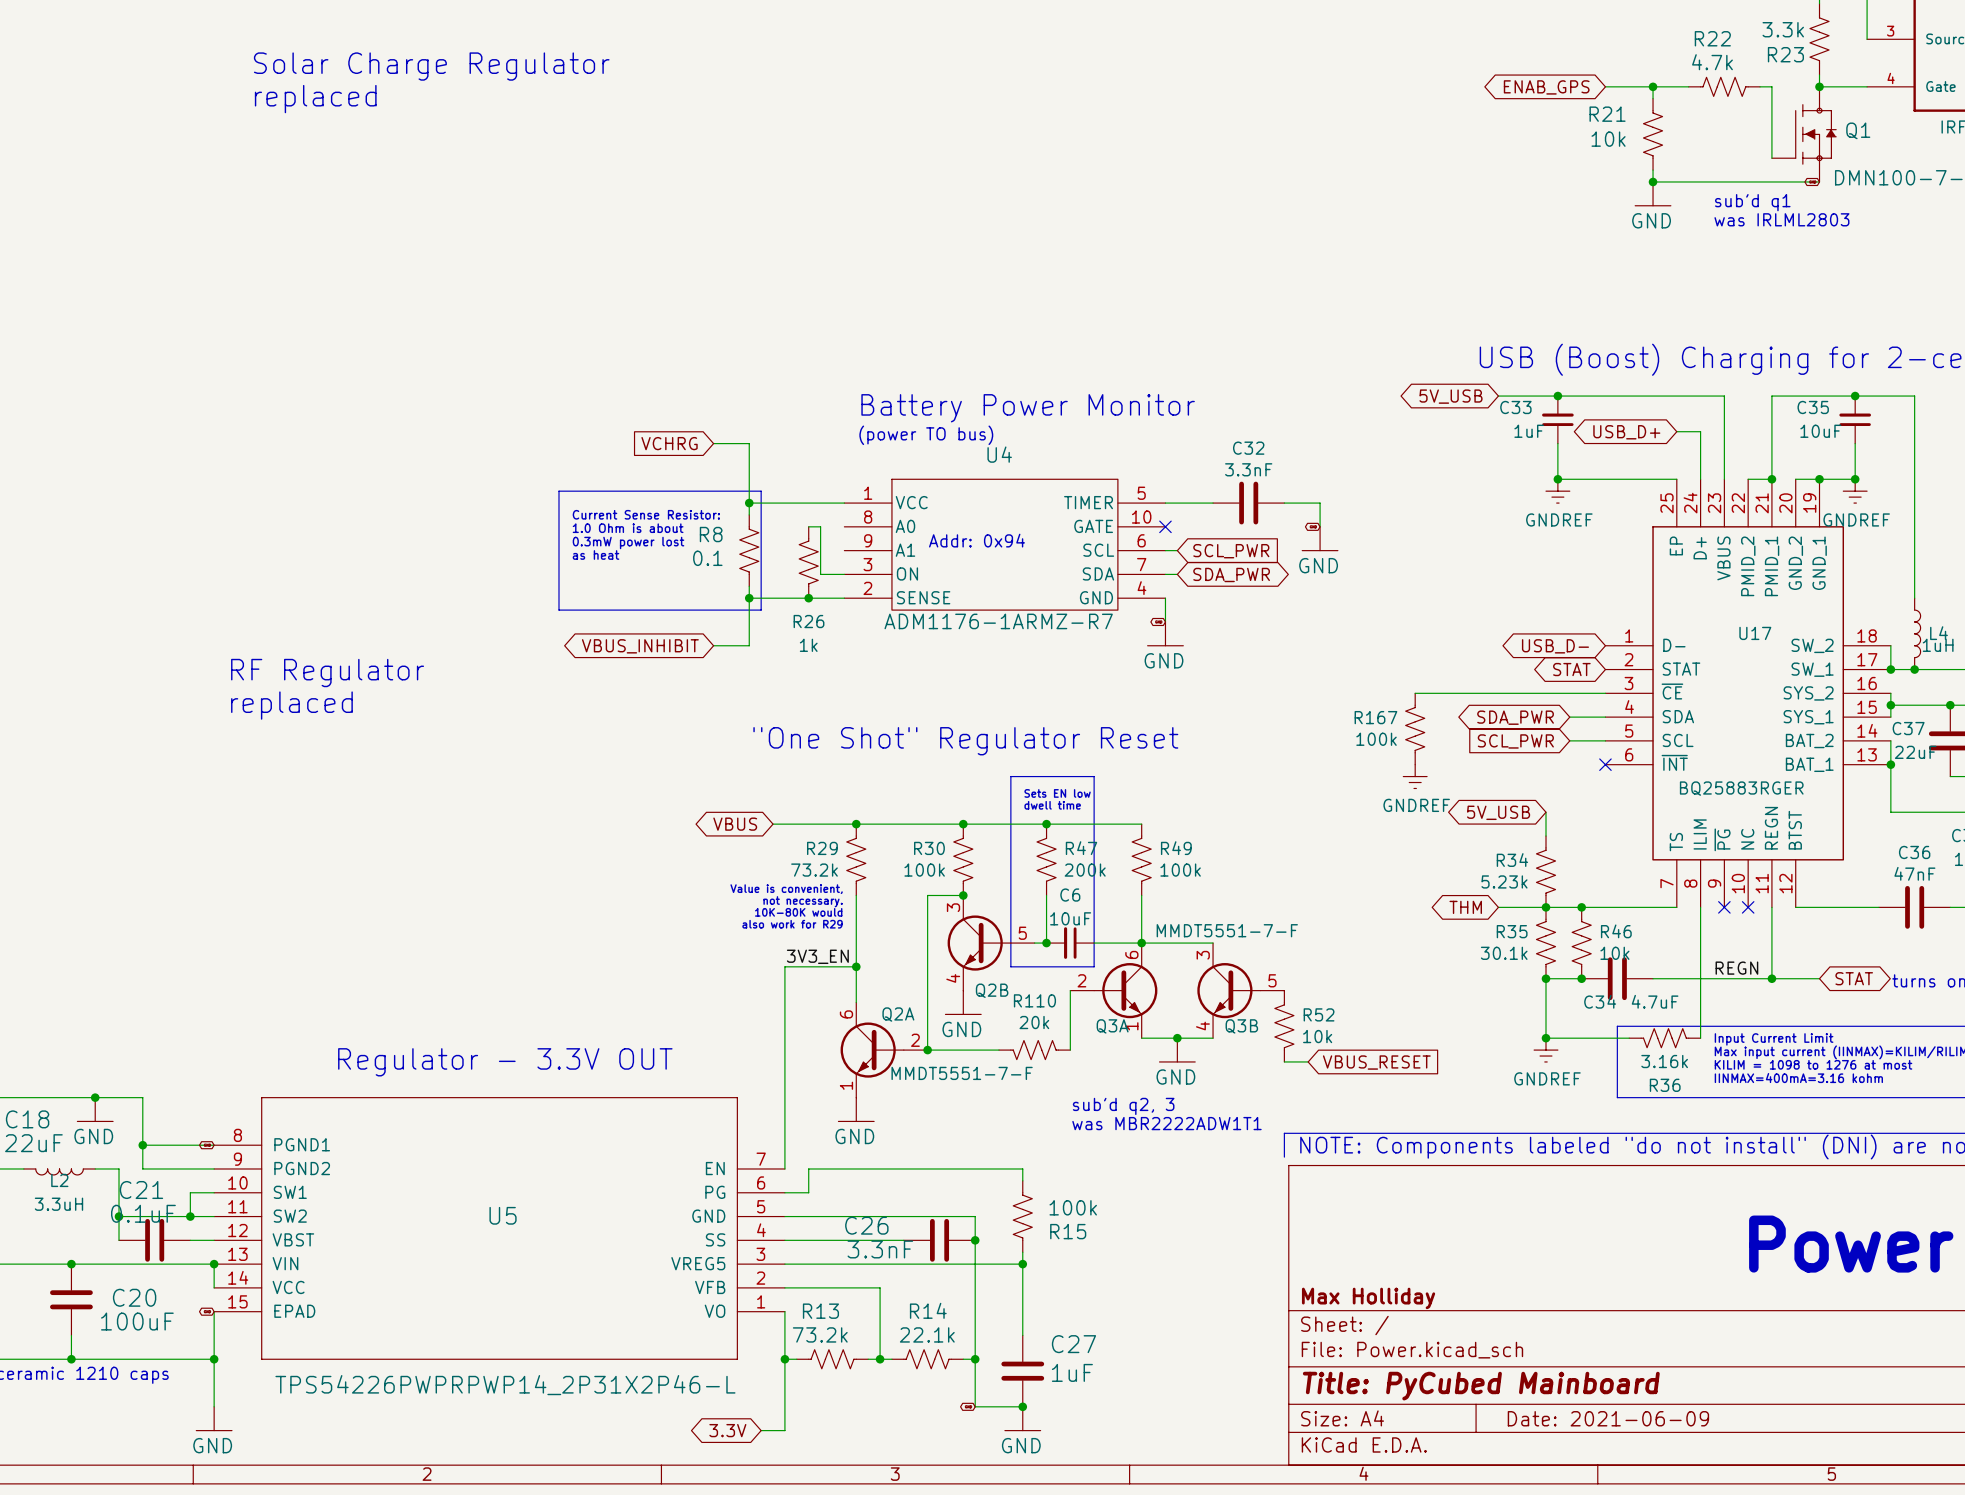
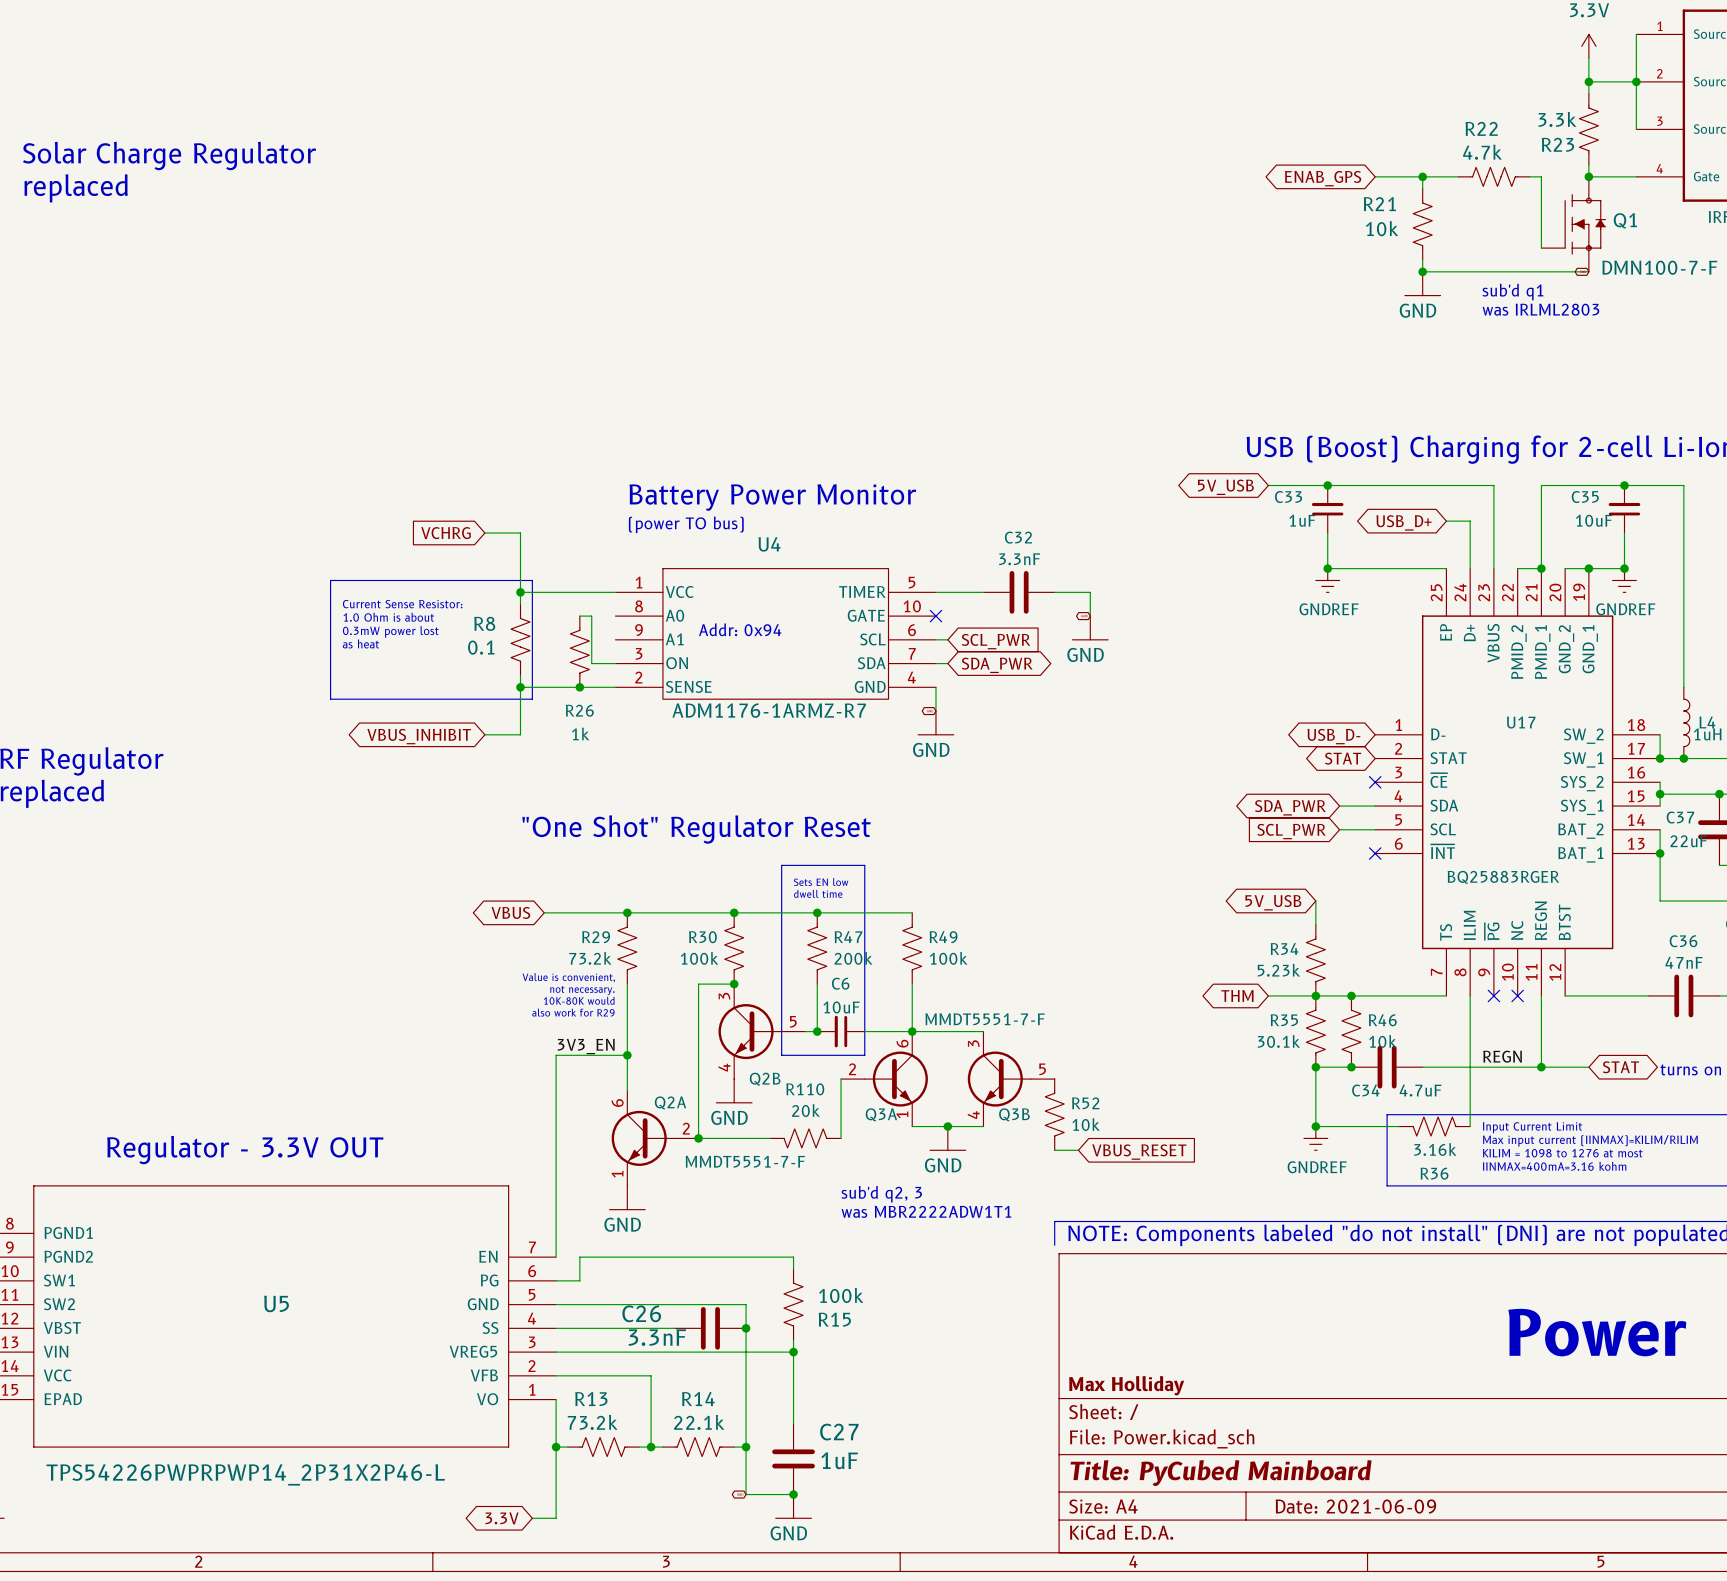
wire: (1415, 693) (1605, 693) -> none
no-connect mark: none -> (1375, 782)
R167: 100k (1415, 729) -> none
power symbol: GNDREF (1415, 776) -> none

